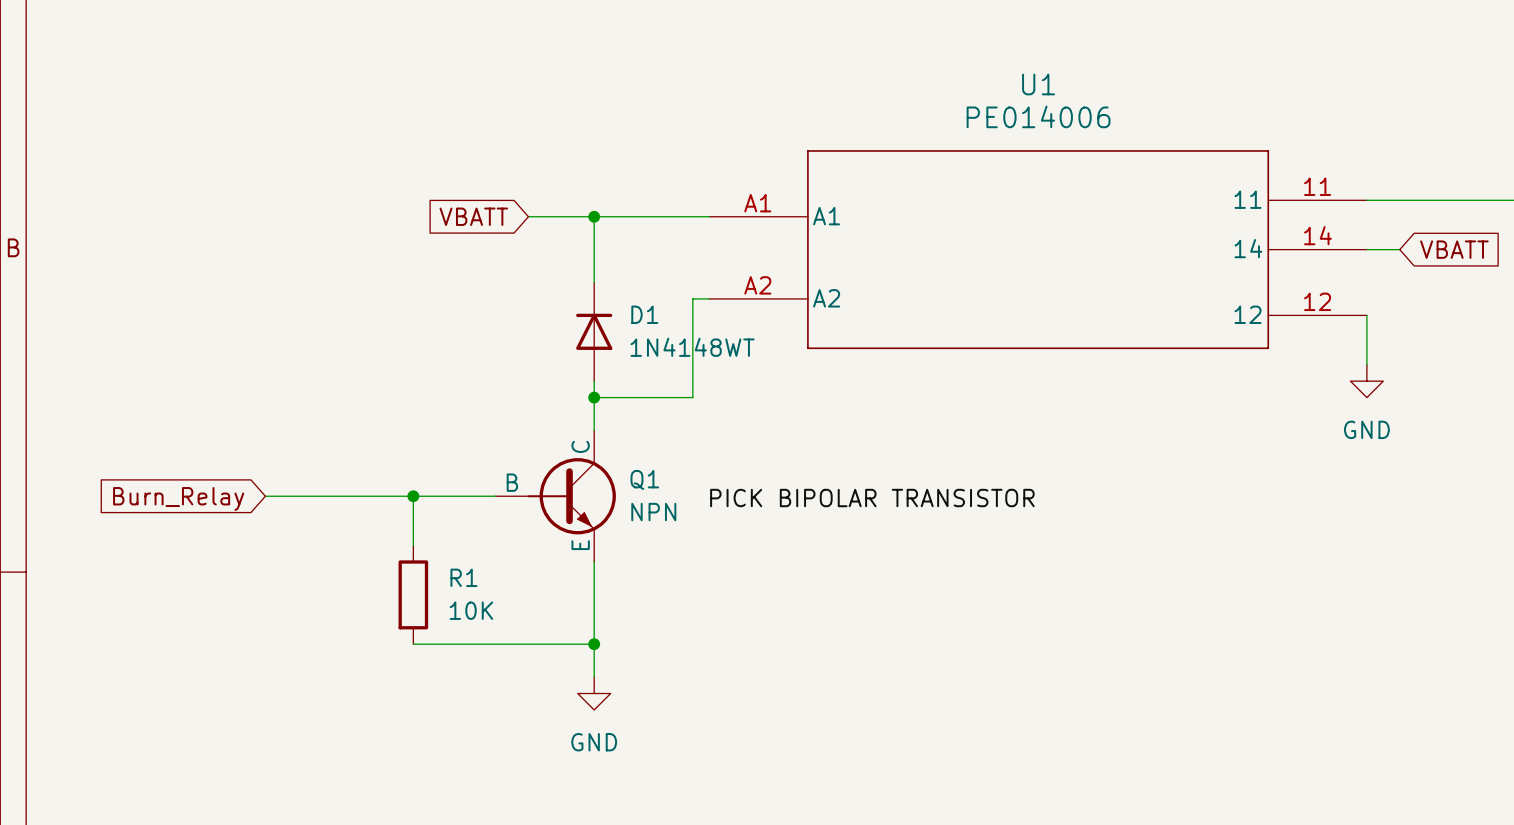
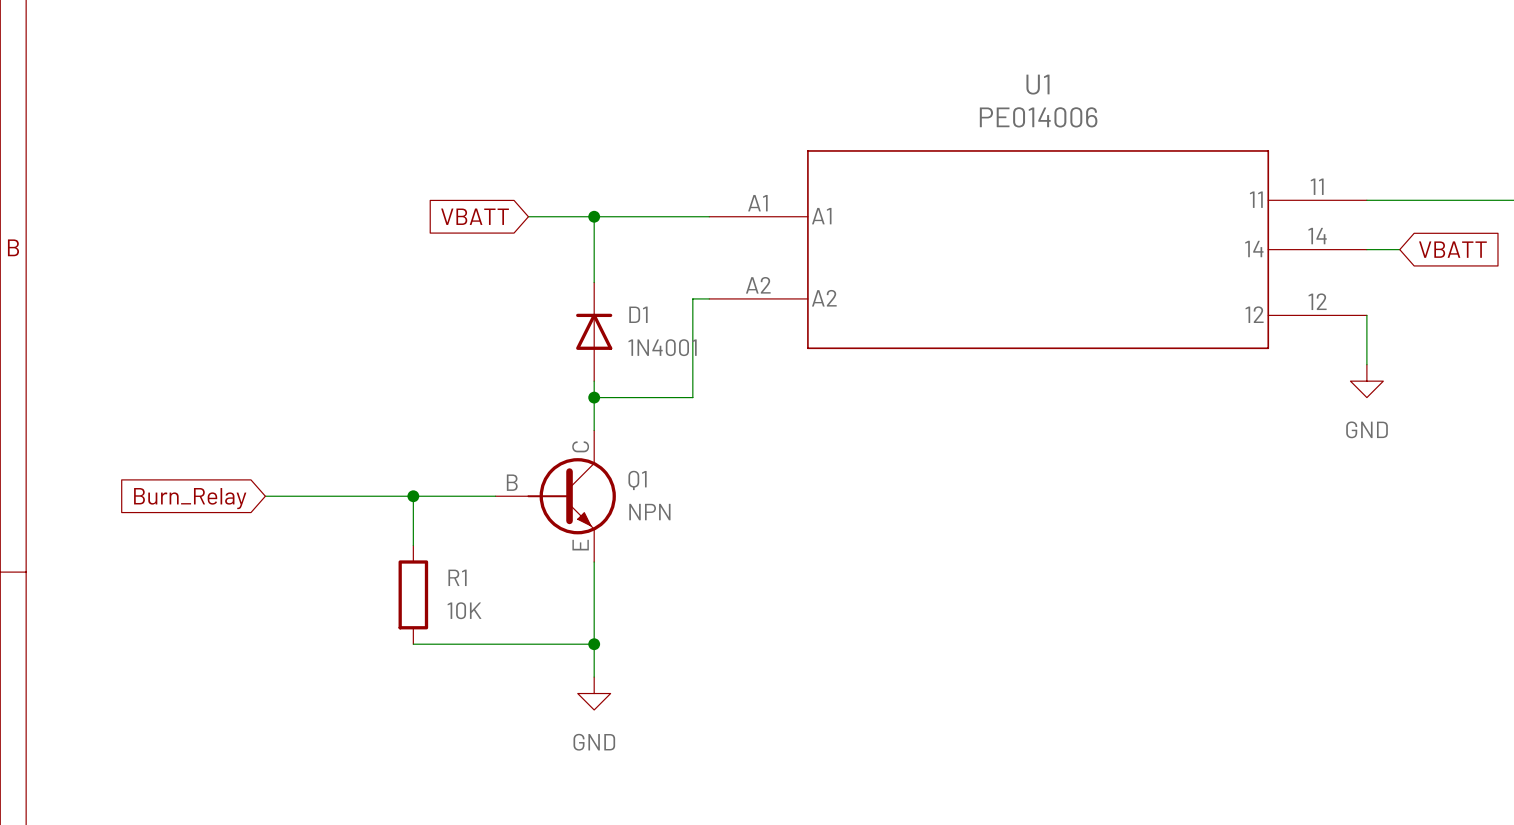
D1 value: 1N4148WT (692, 347) -> 1N4001 (662, 347)
label: PICK BIPOLAR TRANSISTOR (872, 498) -> none

